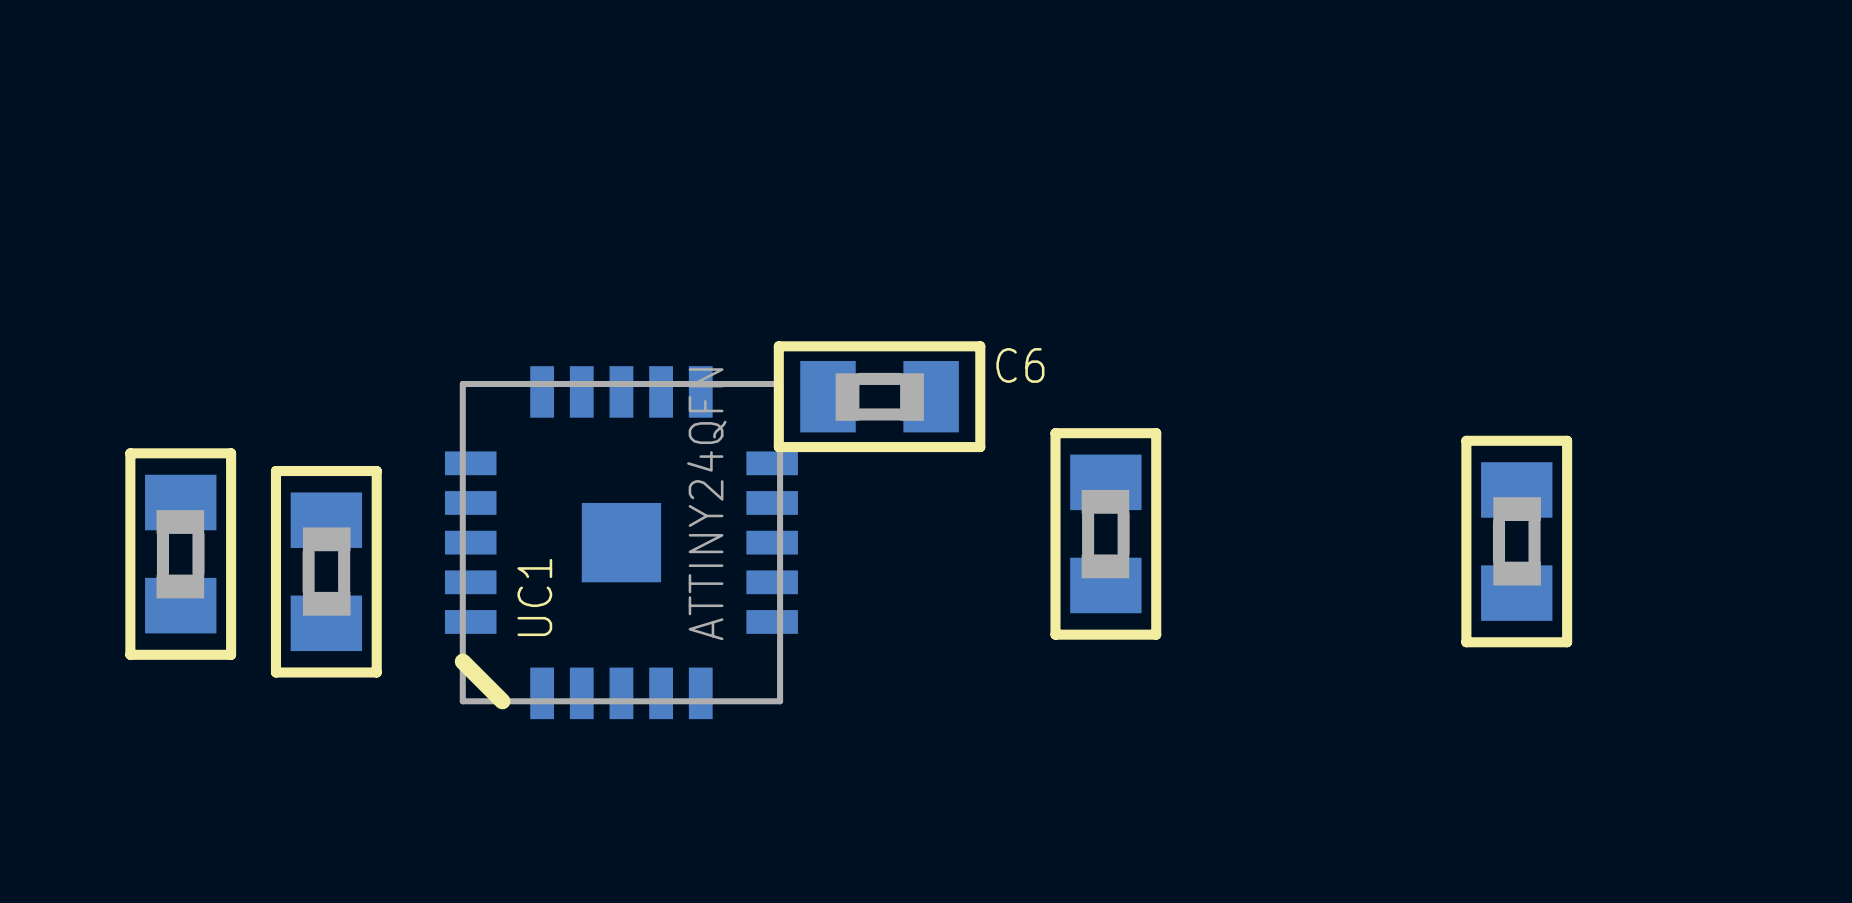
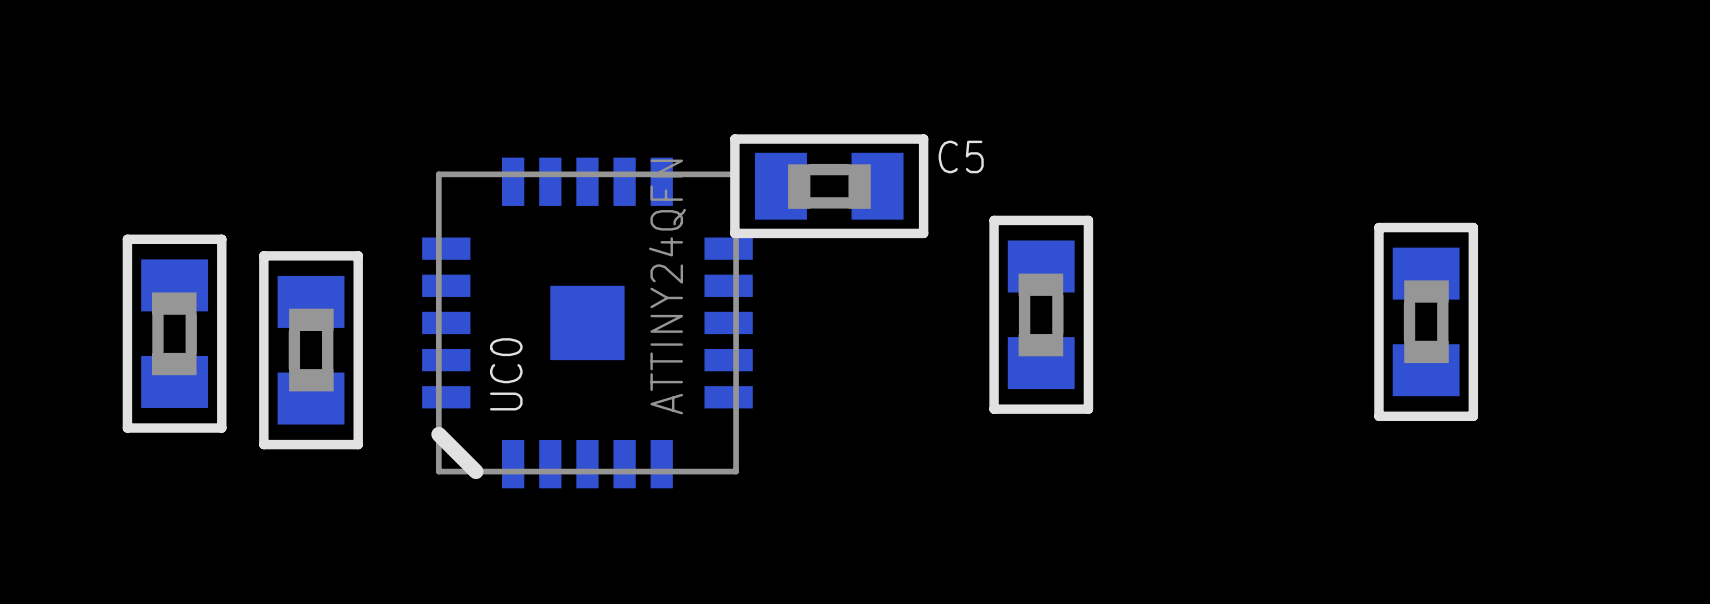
C6 name: C6 (1020, 365) -> C5 (961, 156)
UC1 name: UC1 (534, 597) -> UC0 (506, 374)

